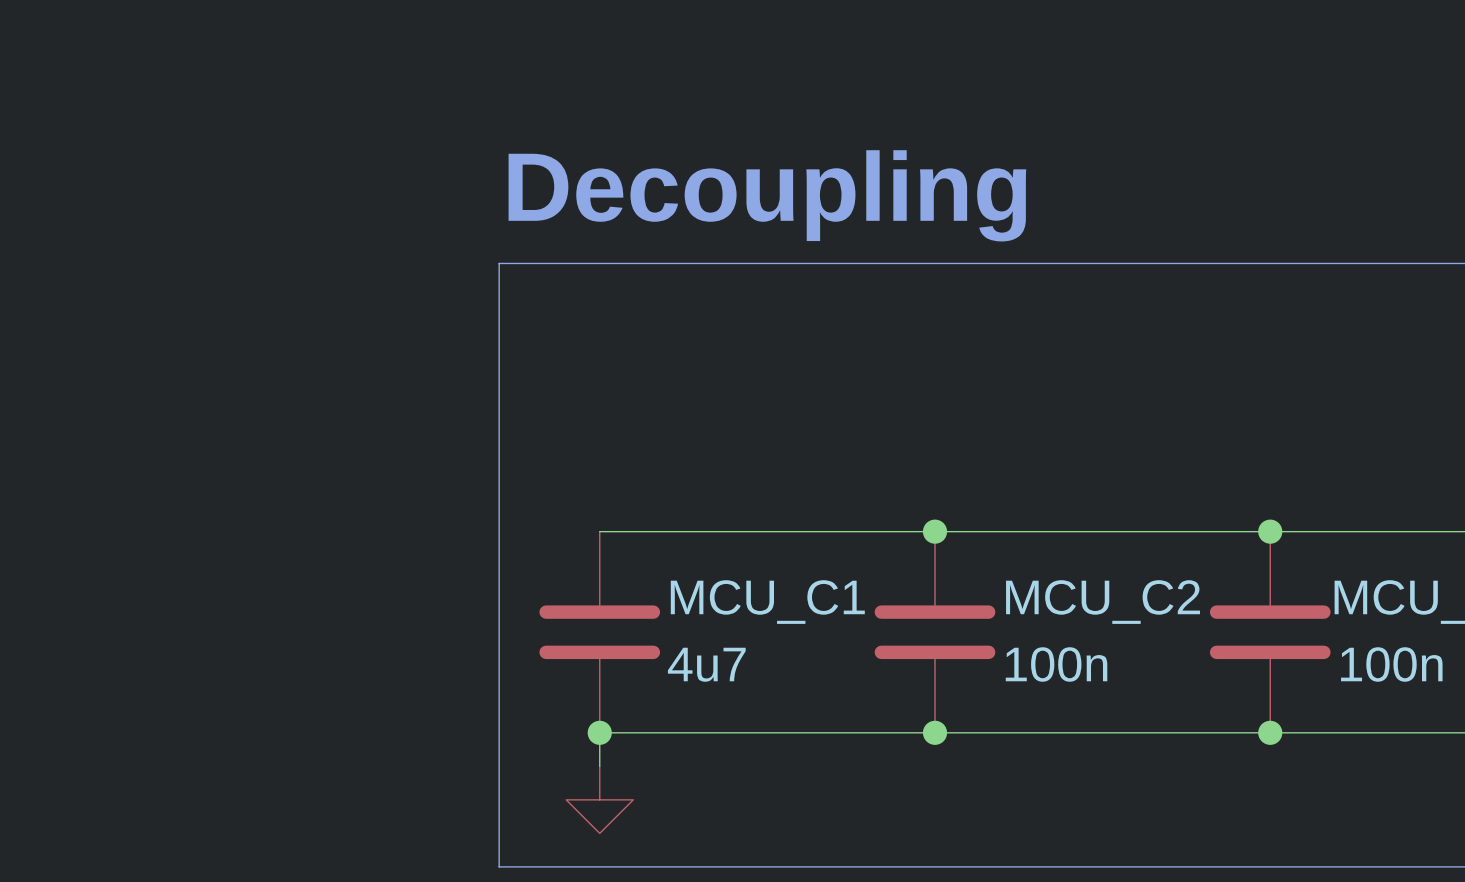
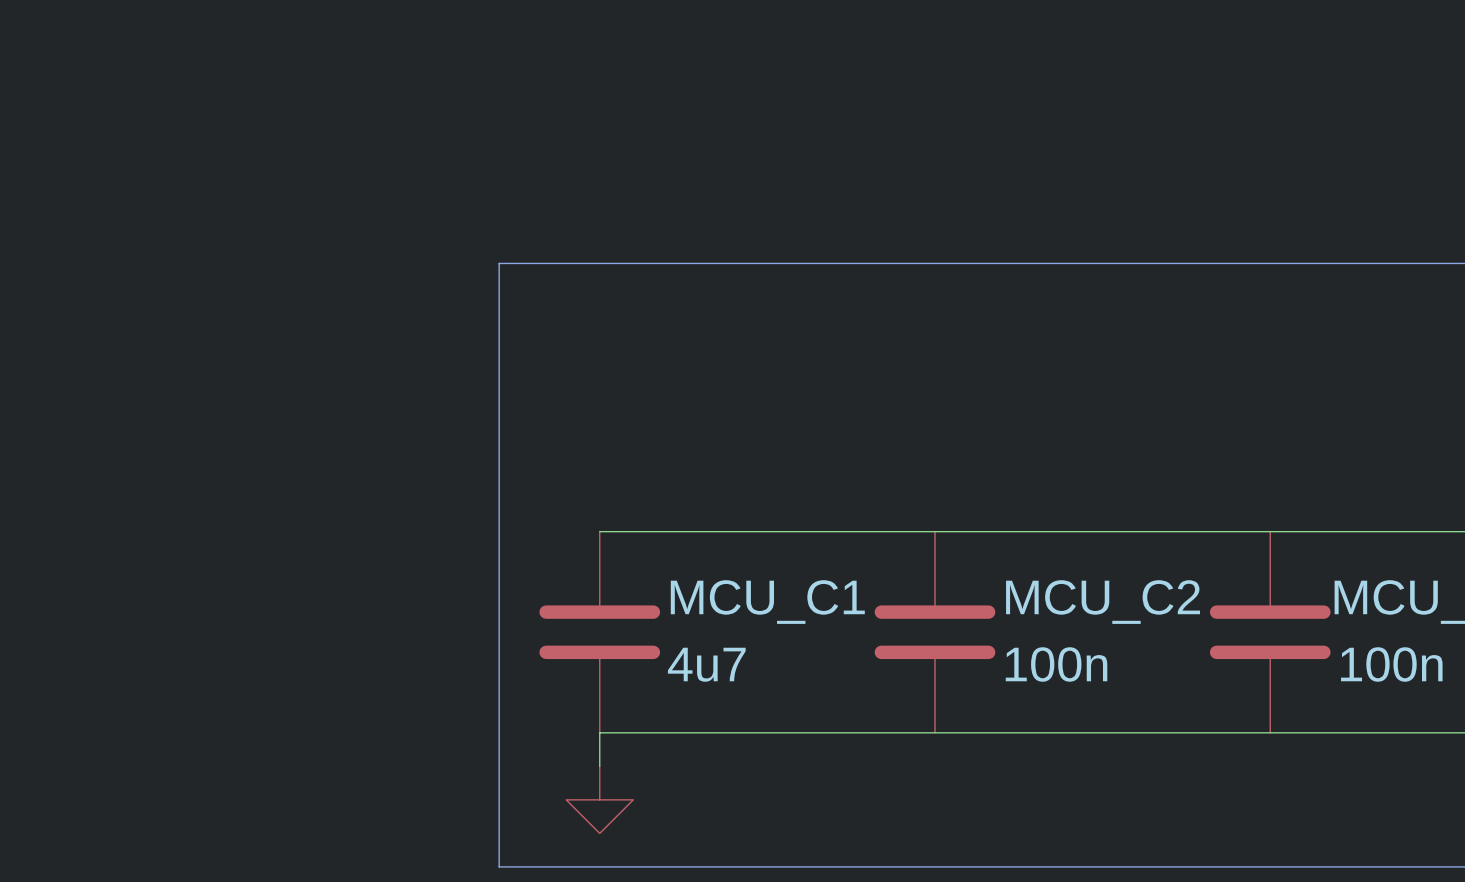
text: Decoupling (767, 195) -> none
junction: (935, 531) -> none
junction: (1270, 531) -> none
junction: (599, 732) -> none
junction: (935, 732) -> none
junction: (1270, 732) -> none

